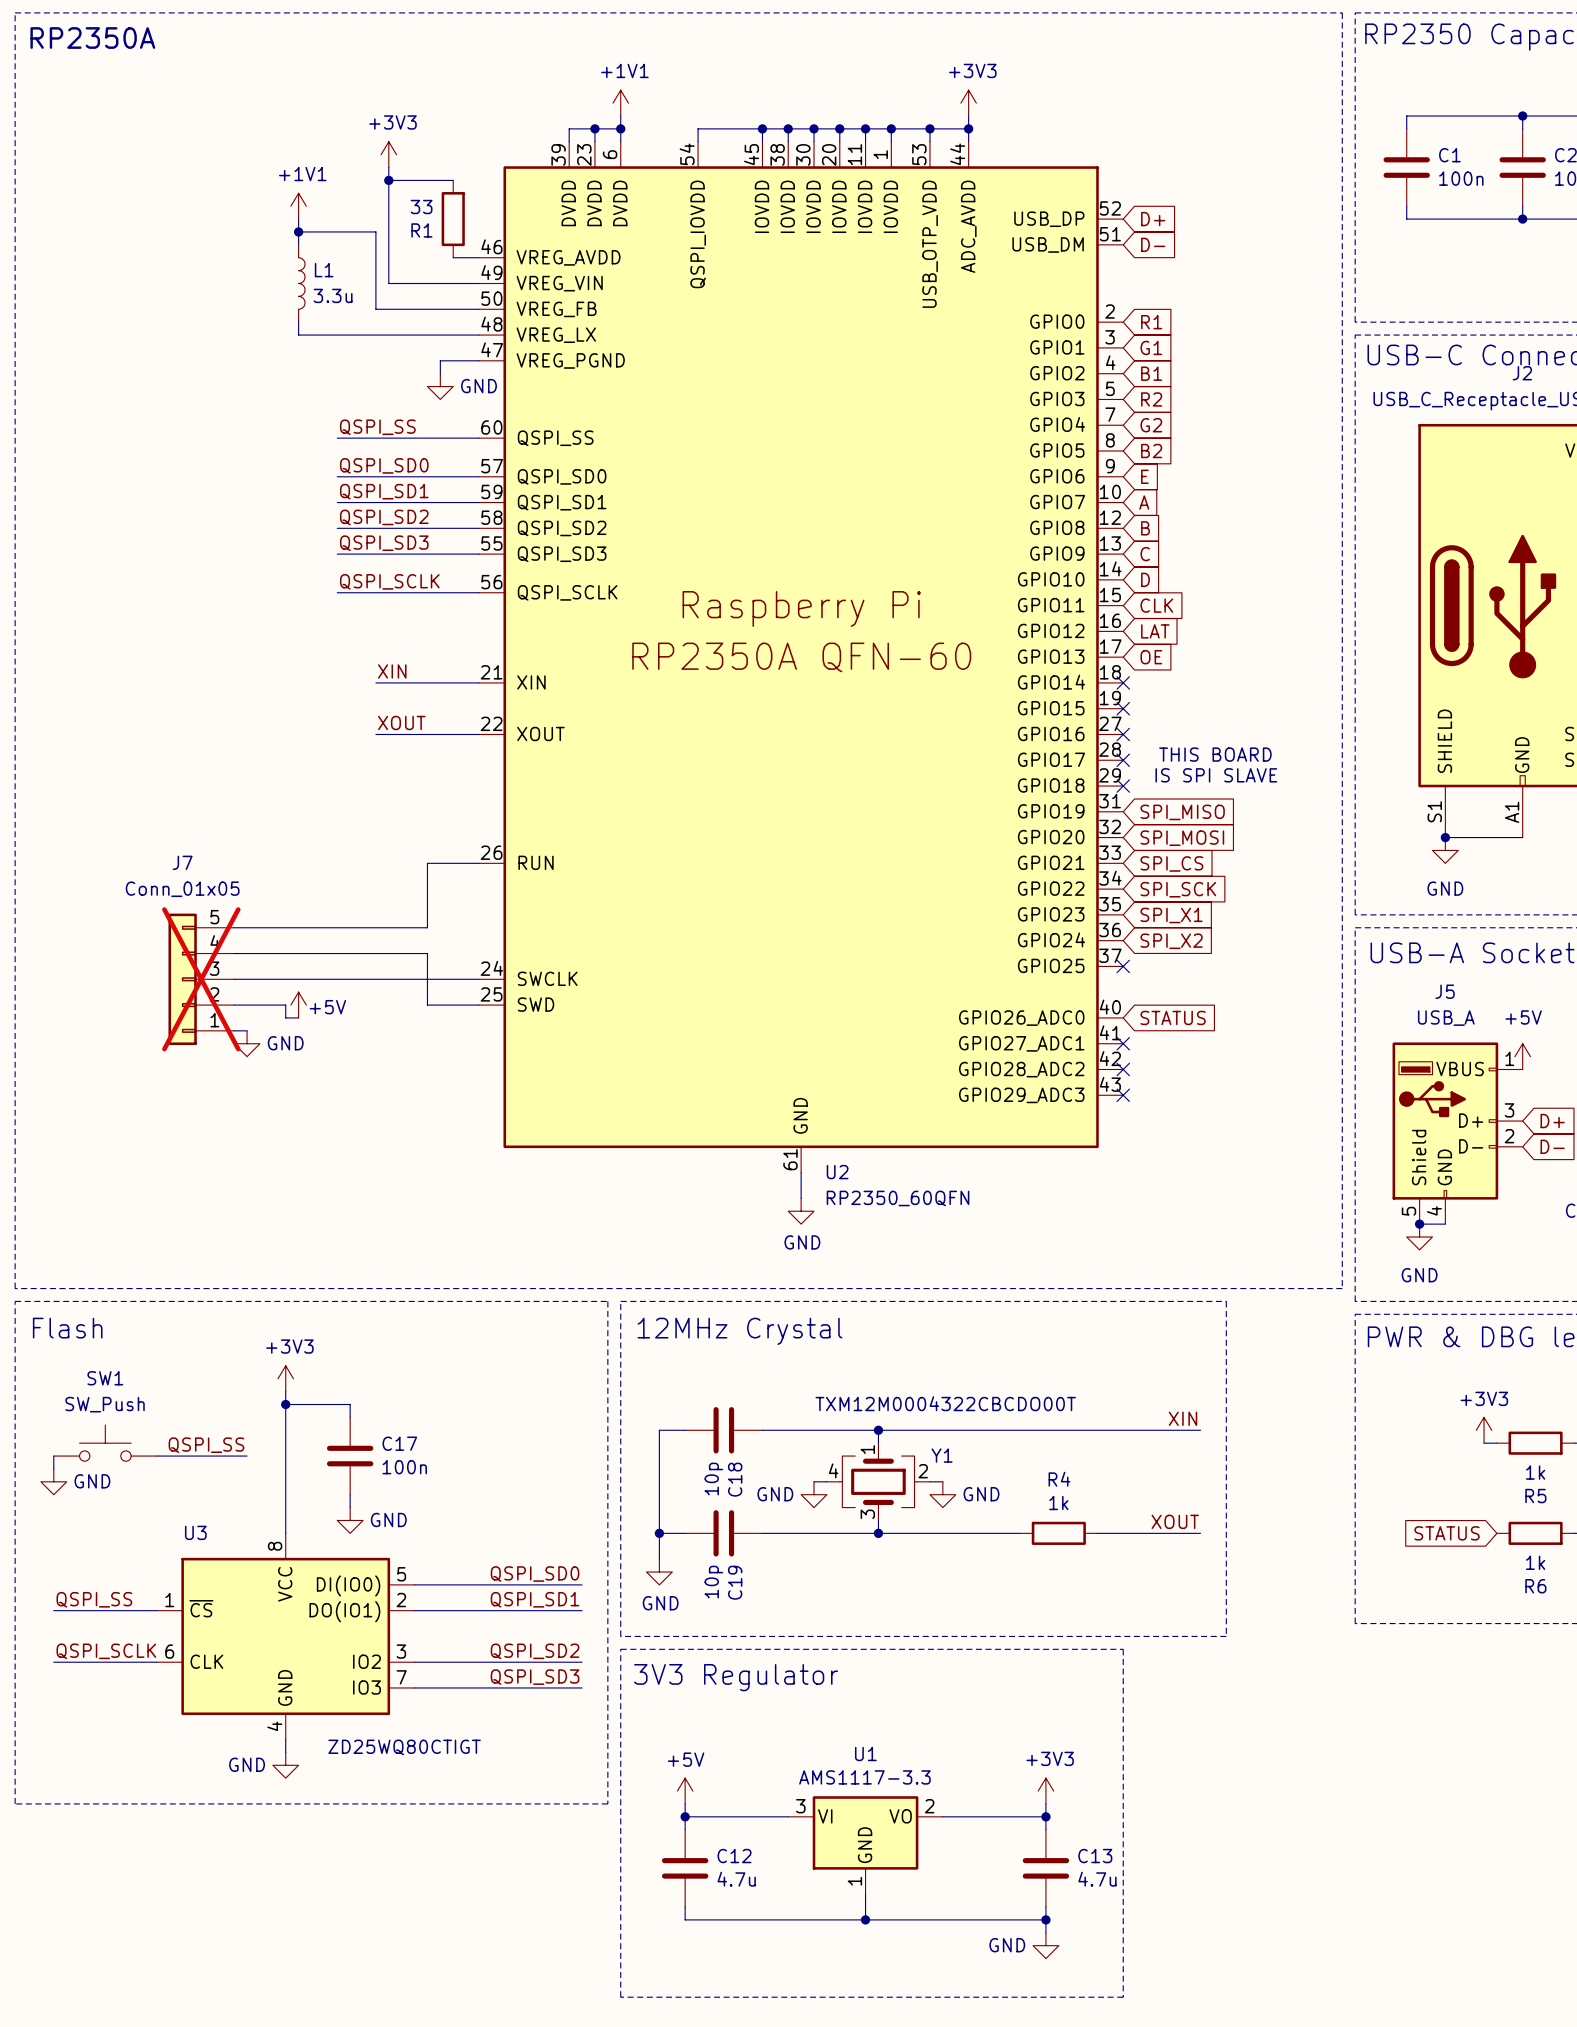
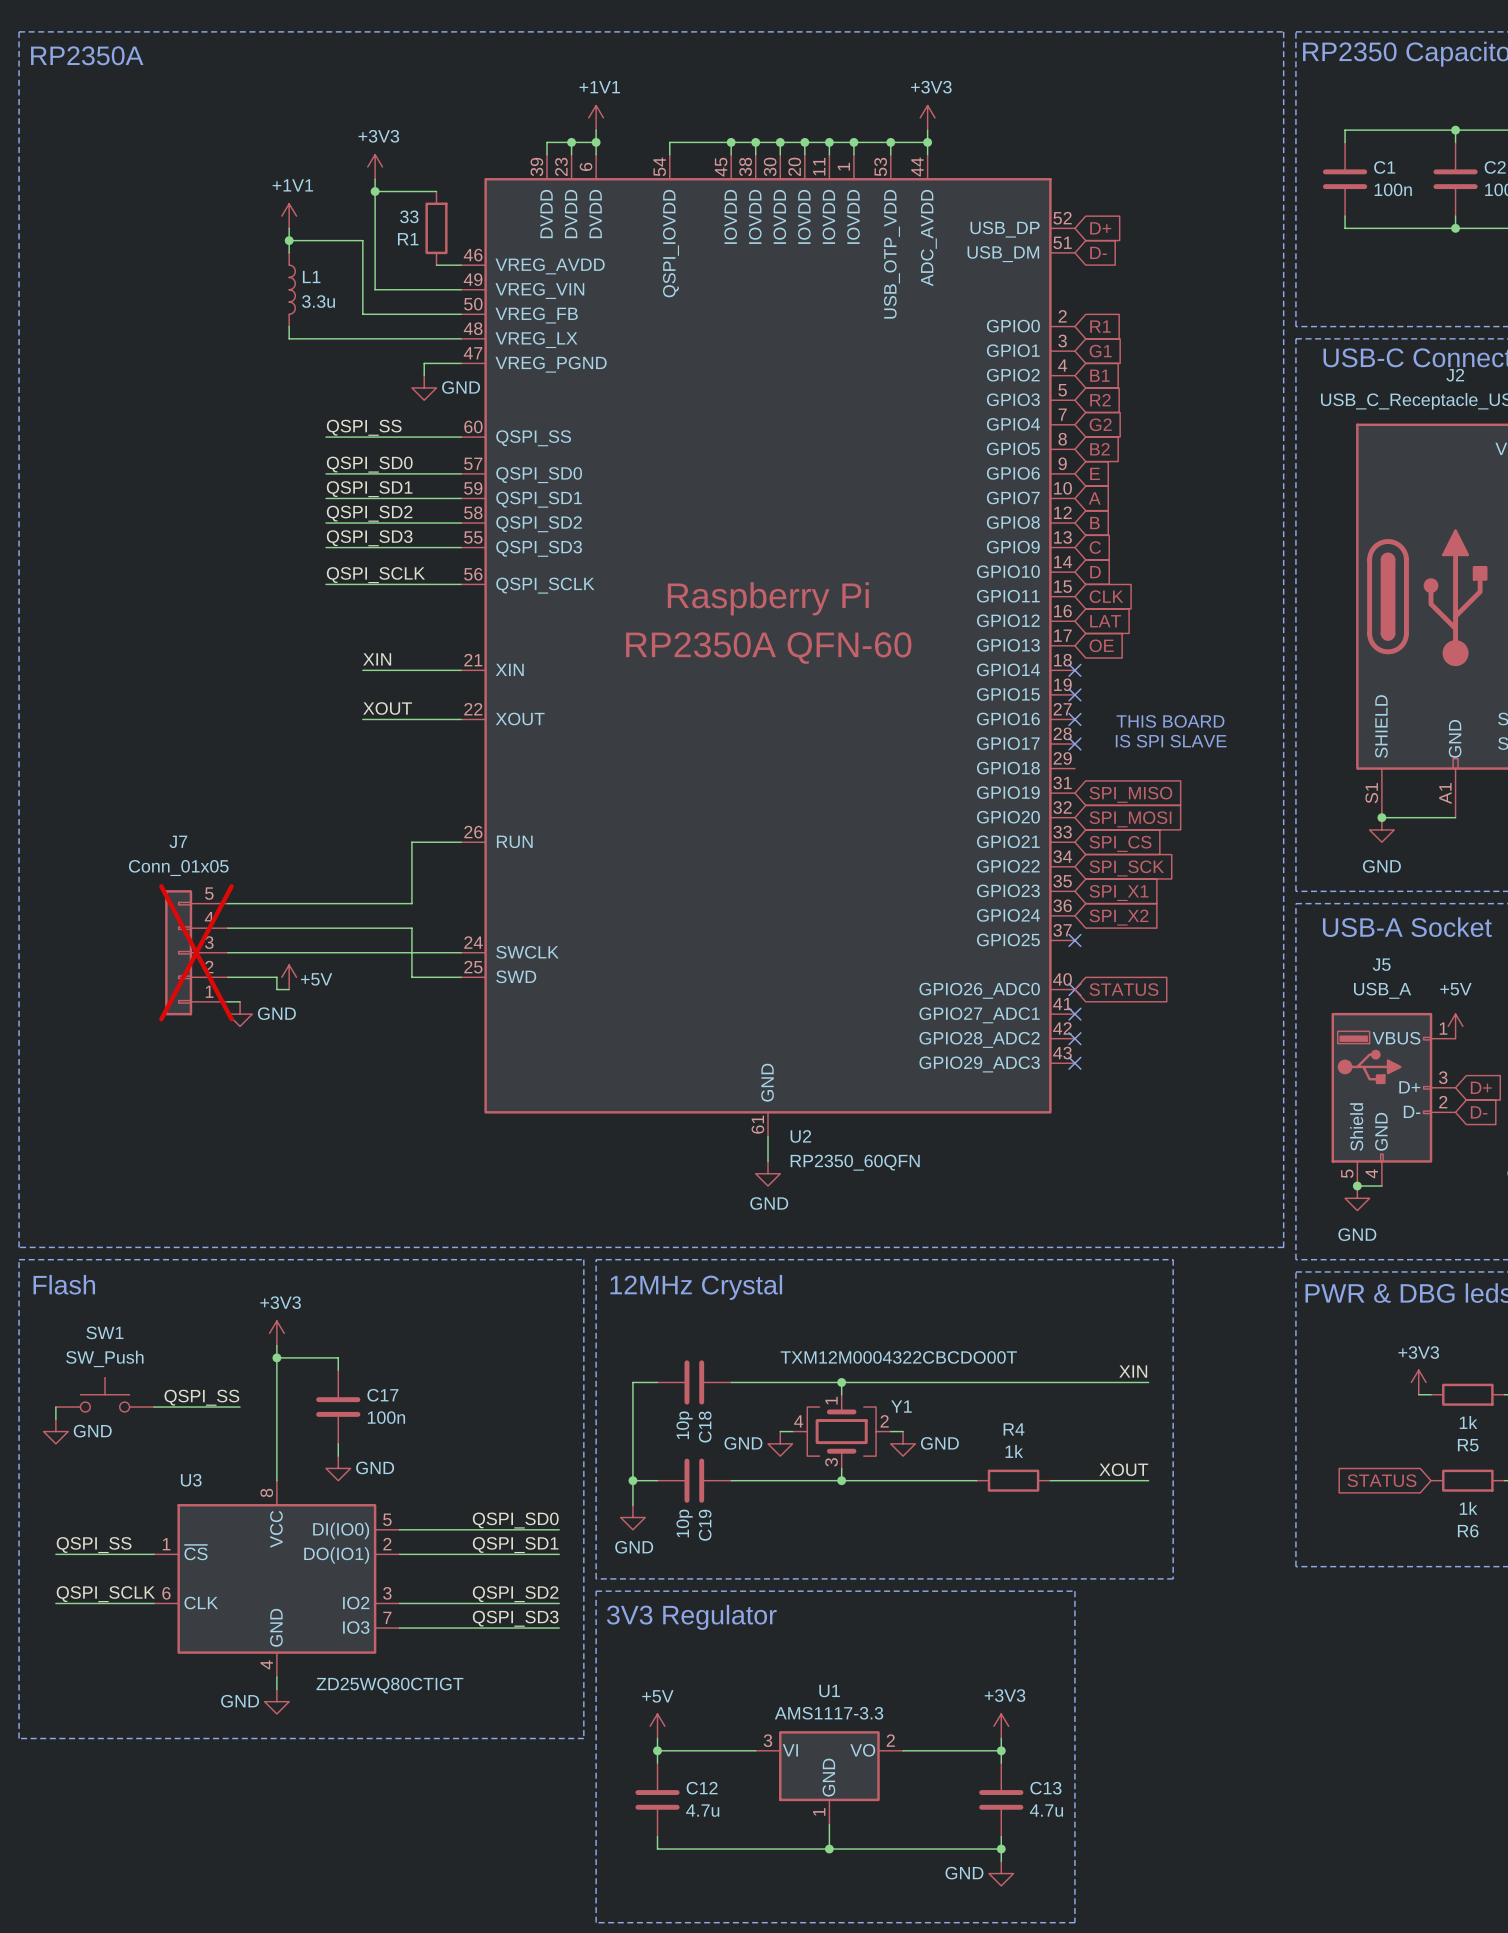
text position: THIS BOARD (1215, 754) -> THIS BOARD (1170, 721)
text position: IS SPI SLAVE (1216, 775) -> IS SPI SLAVE (1171, 741)
no-connect mark: (1123, 786) -> none
no-connect mark: none -> (1074, 989)

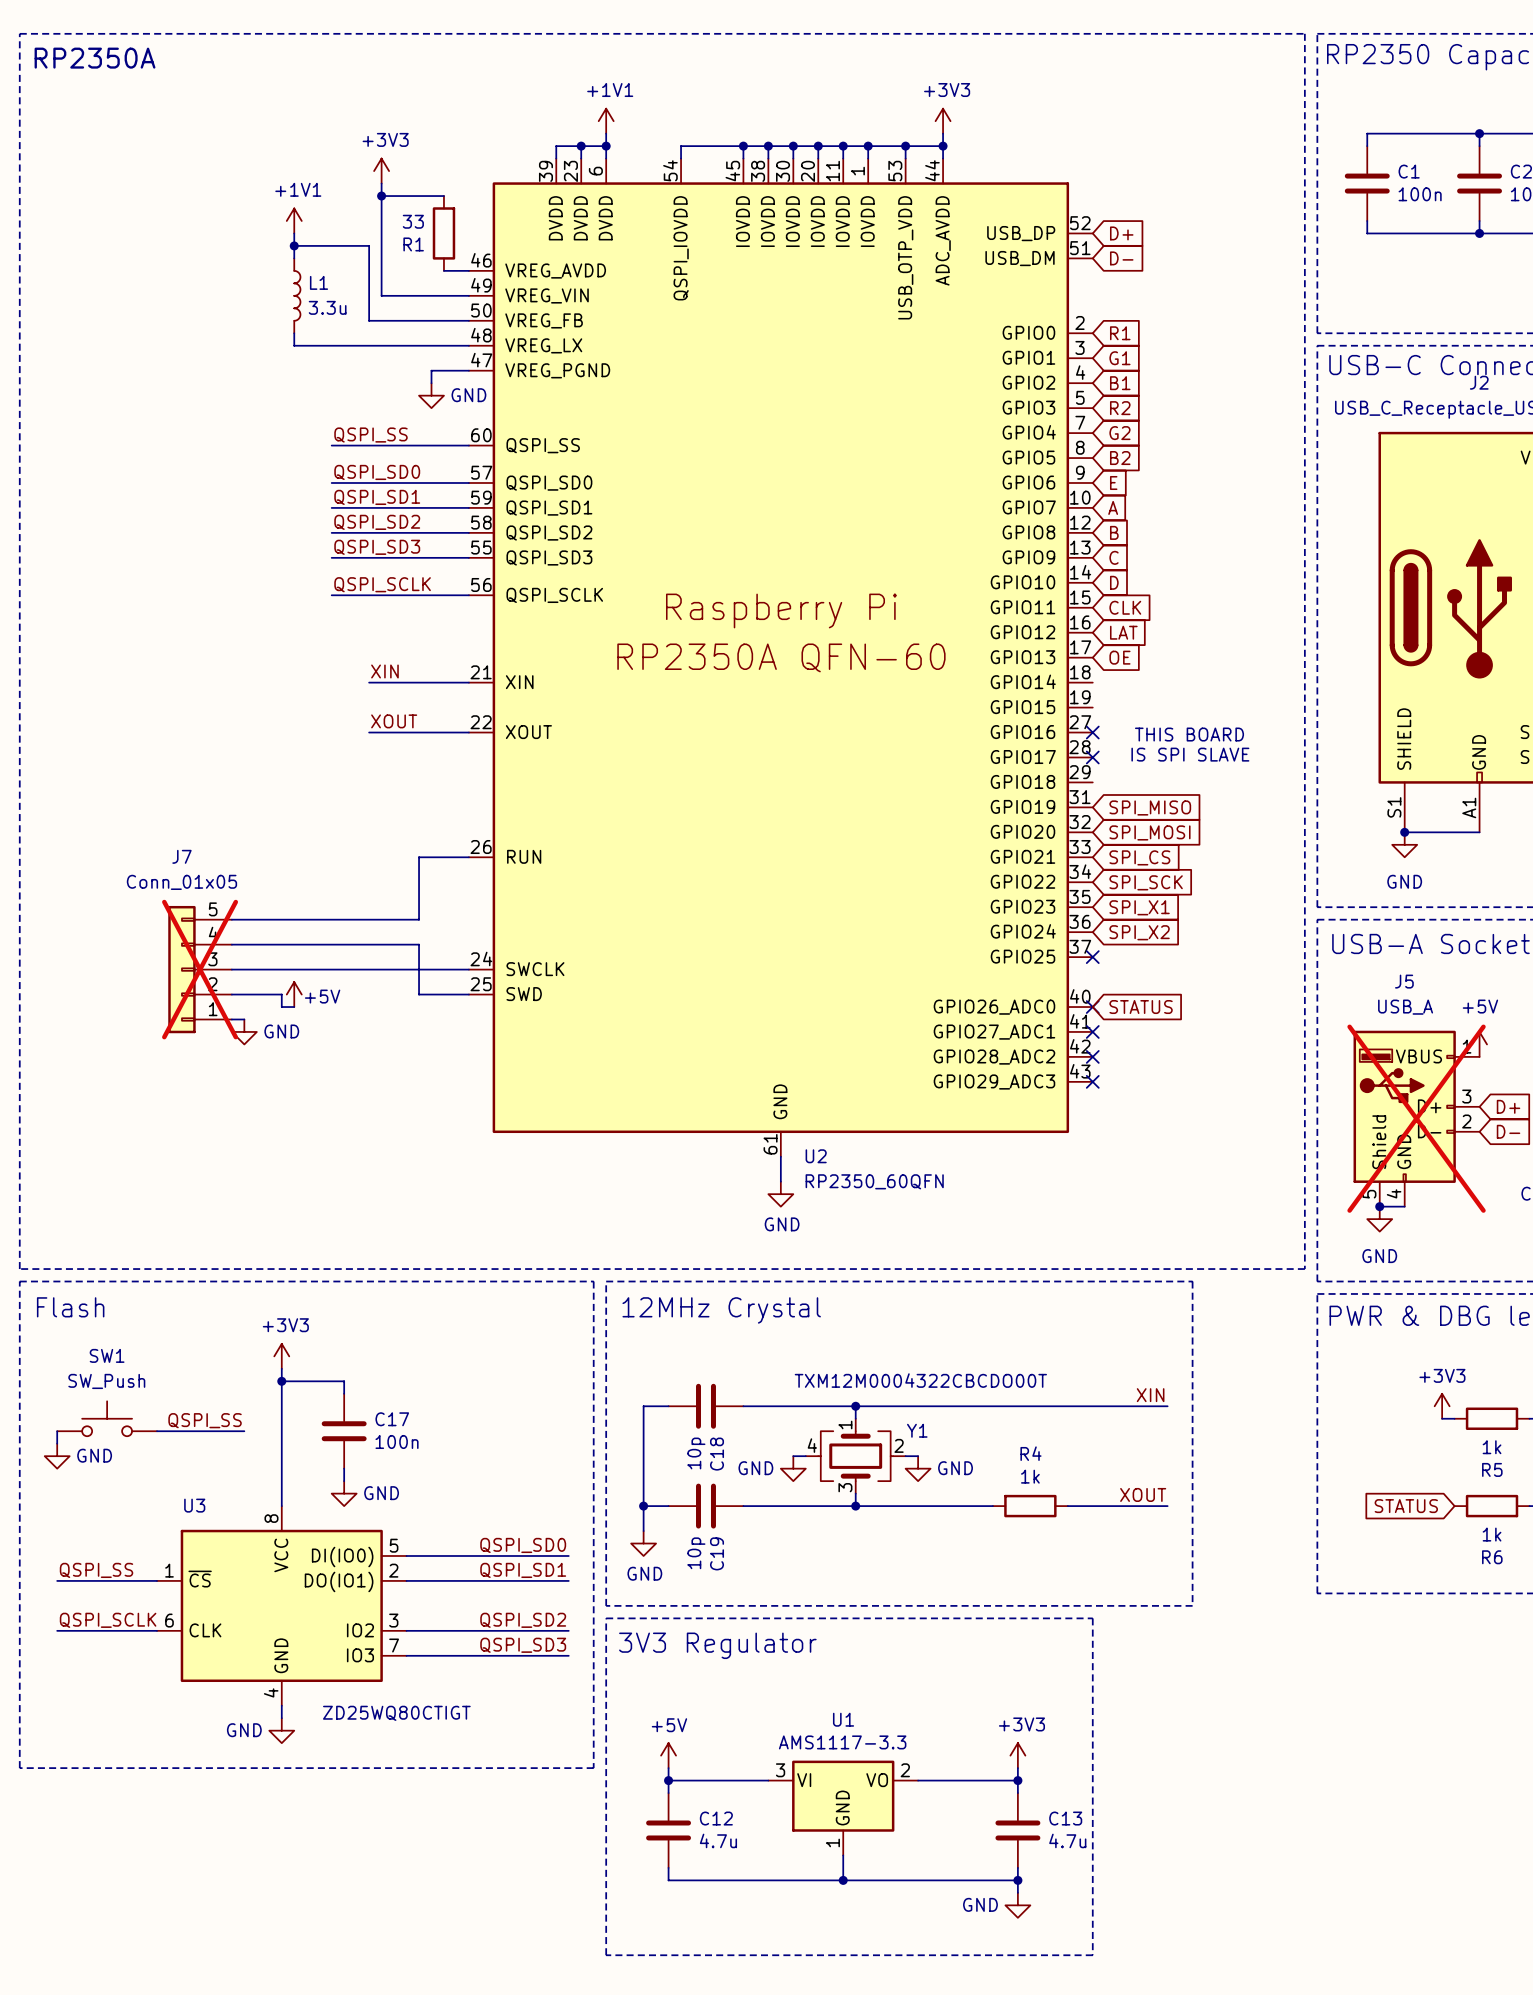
no-connect mark: (1074, 670) -> none
no-connect mark: (1074, 694) -> none
J5 do-not-place cross: none -> (1416, 1118)

